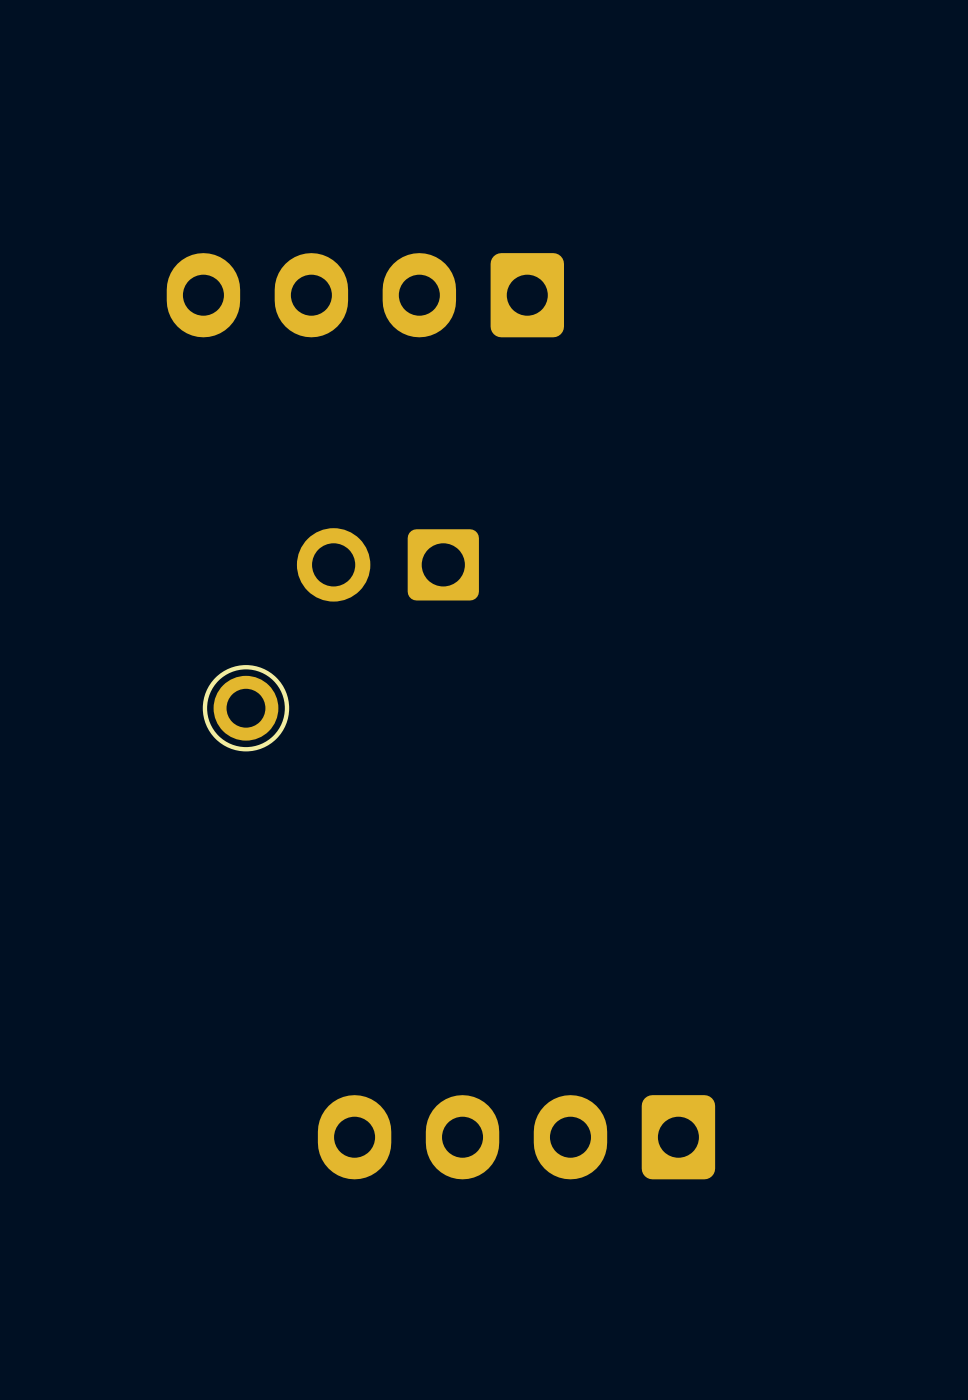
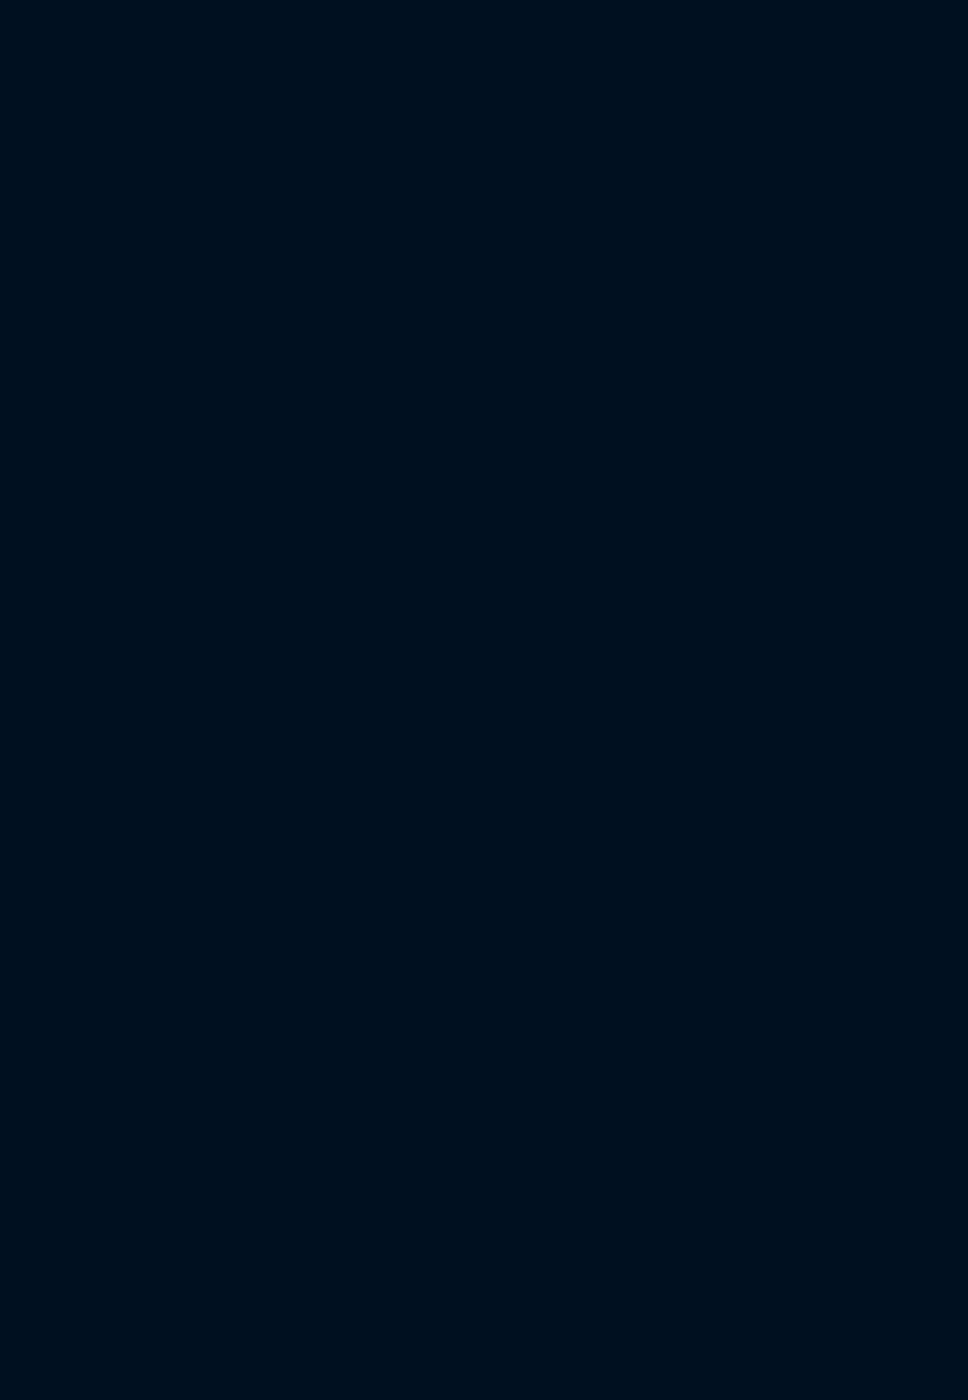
part: (365, 295) -> none
part: (387, 564) -> none
part: (245, 708) -> none
part: (516, 1137) -> none

